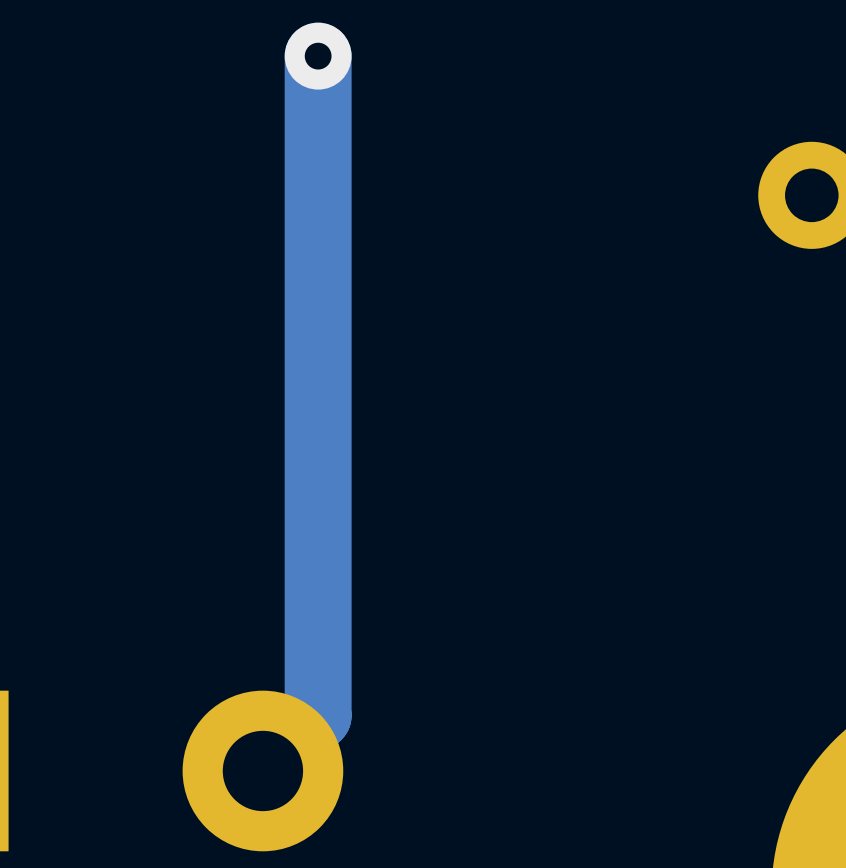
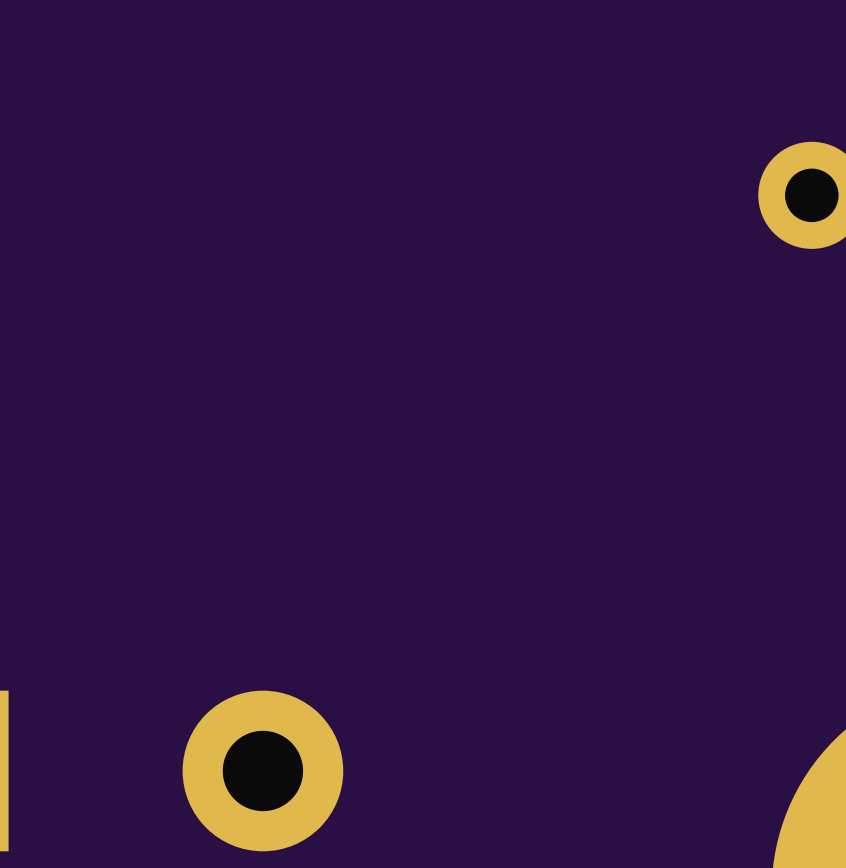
track: (318, 56) (318, 715) (262, 770) -> none
via: (318, 56) -> none

